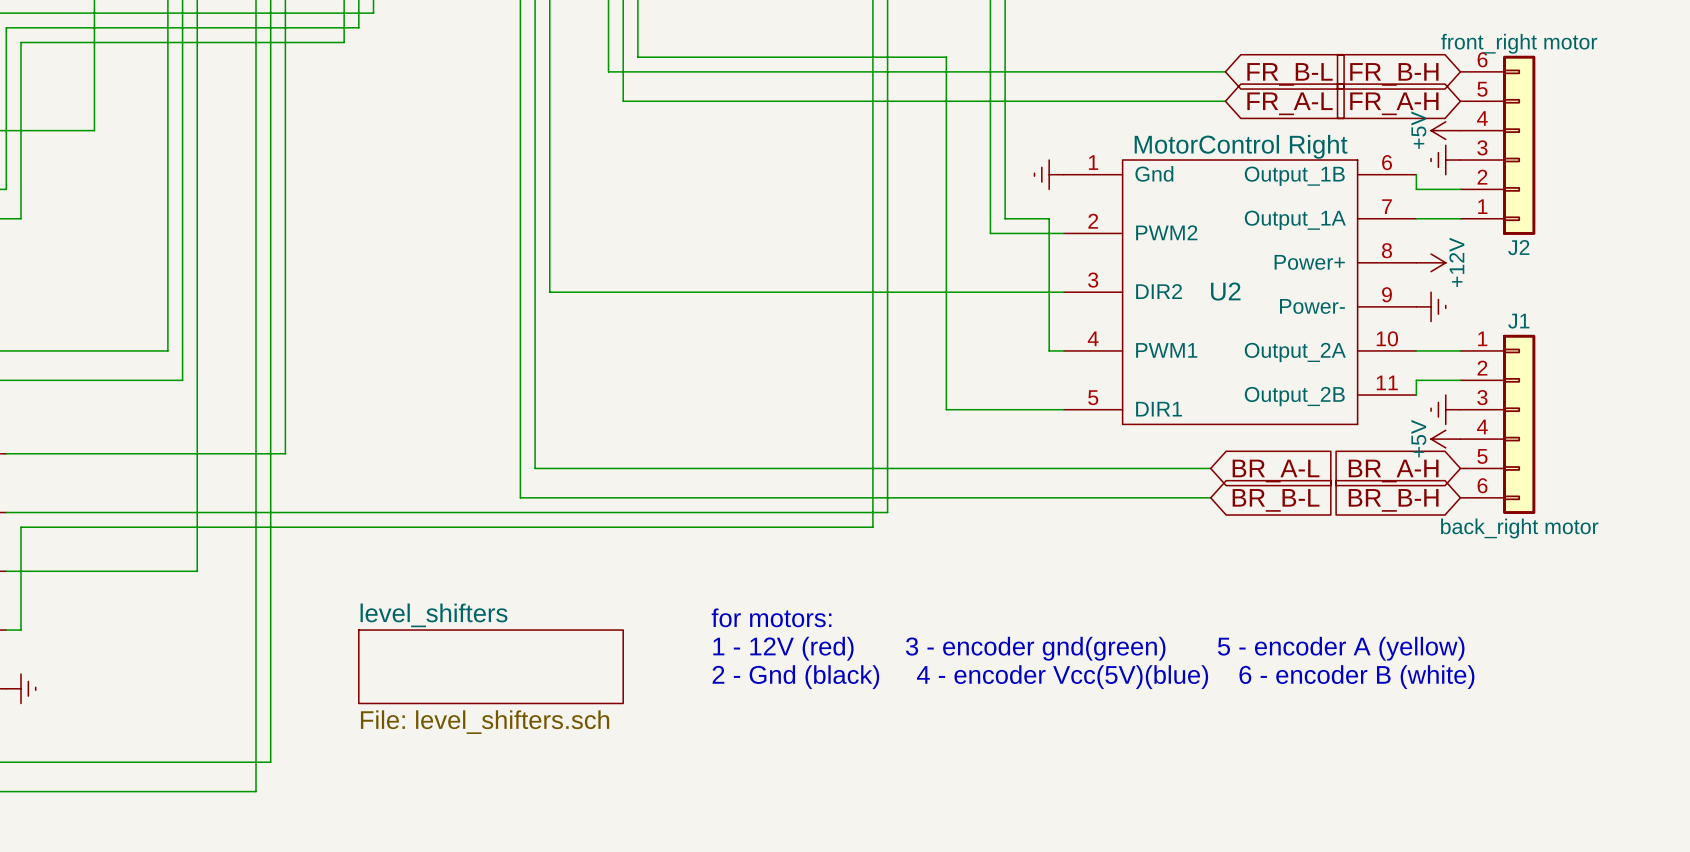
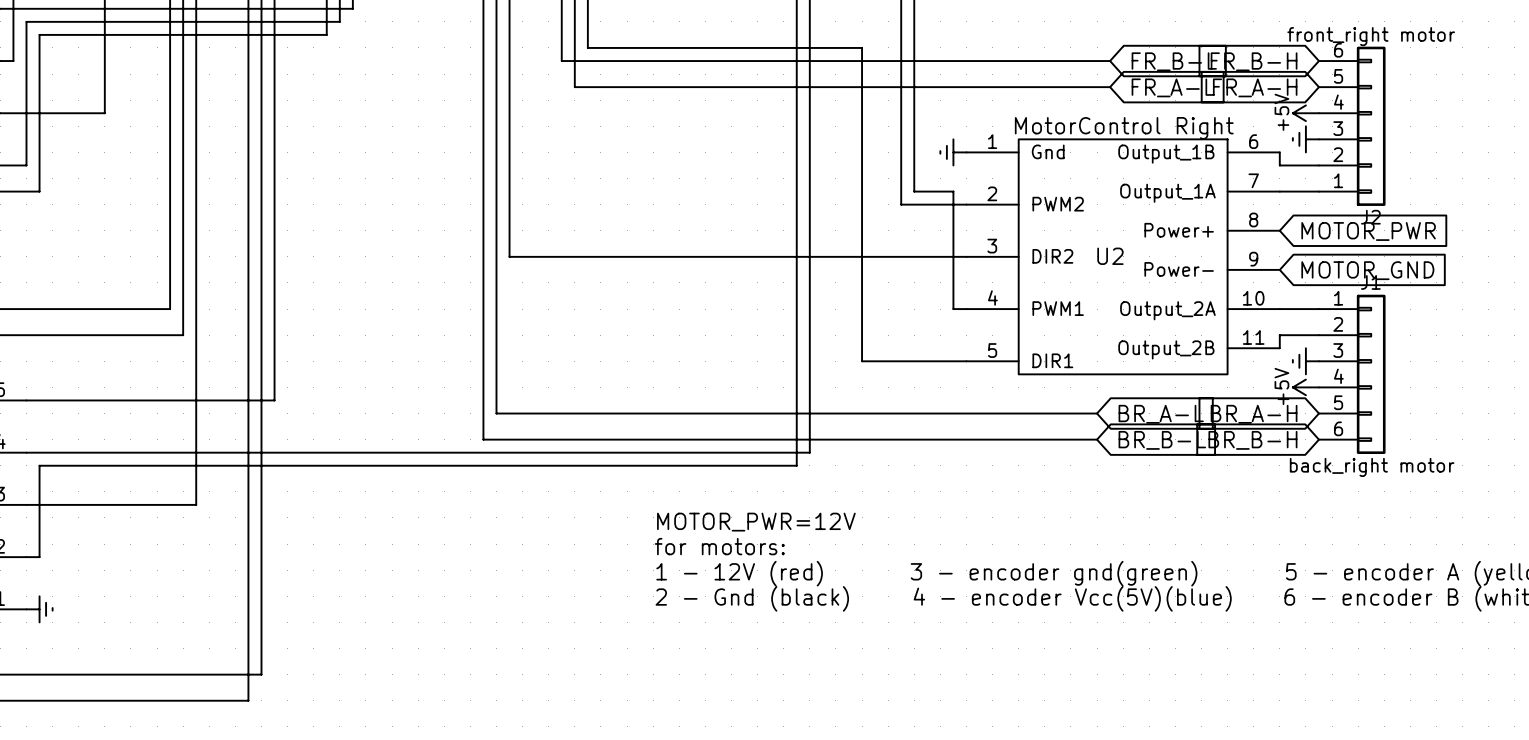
power symbol: +12V (1431, 262) -> none
global label: none -> MOTOR_PWR (1368, 231)
power symbol: (1431, 306) -> none
global label: none -> MOTOR_GND (1367, 270)
text: none -> MOTOR_PWR=12V (756, 522)
sheet level_shifters: File: level_shifters.sch (491, 666) -> none

